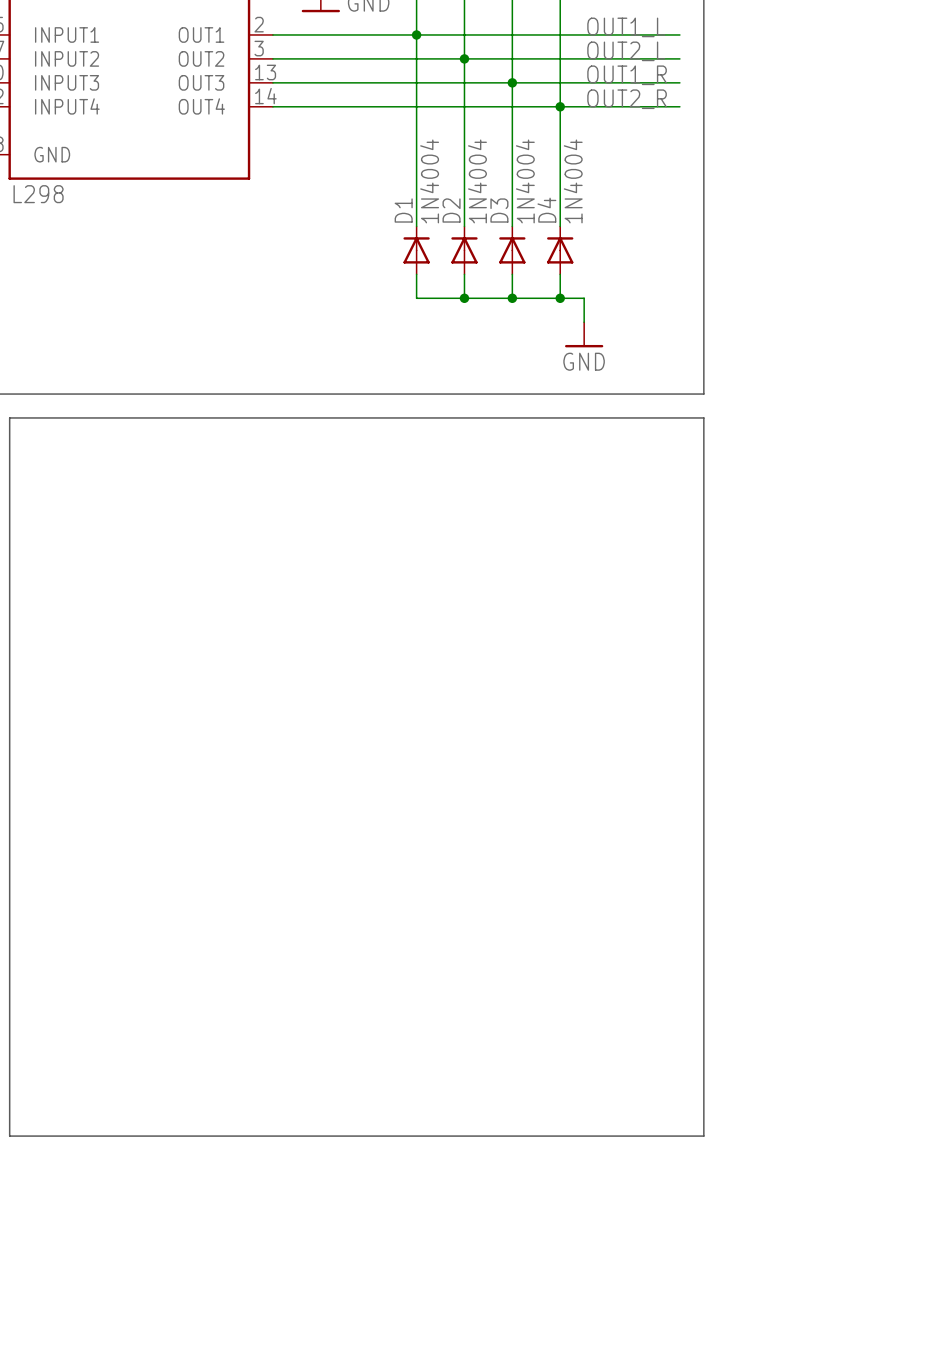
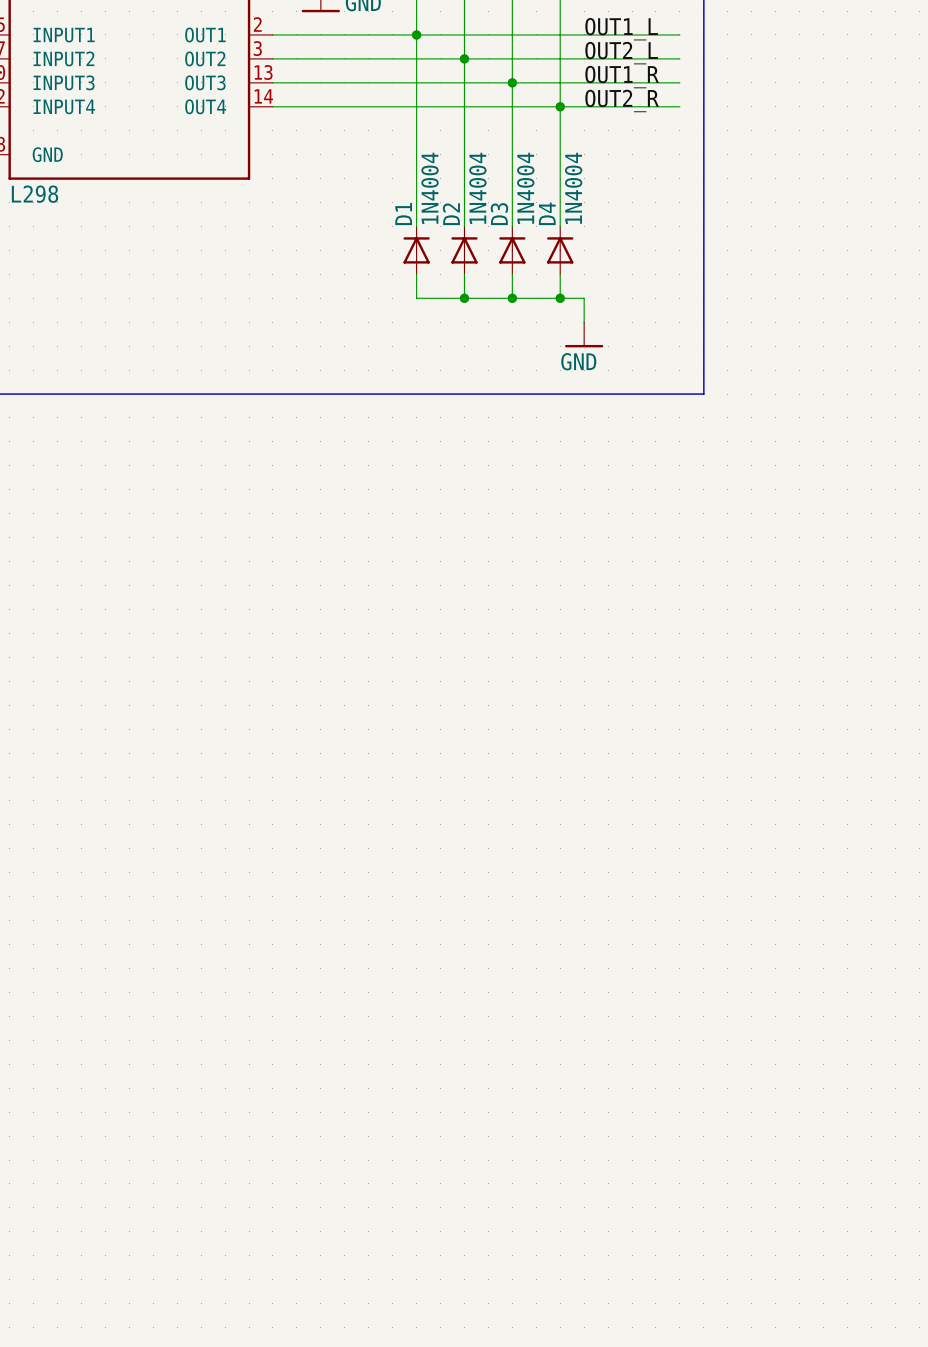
line: (9, 417) (9, 1136) (703, 1136) (703, 417) (9, 417) -> none

